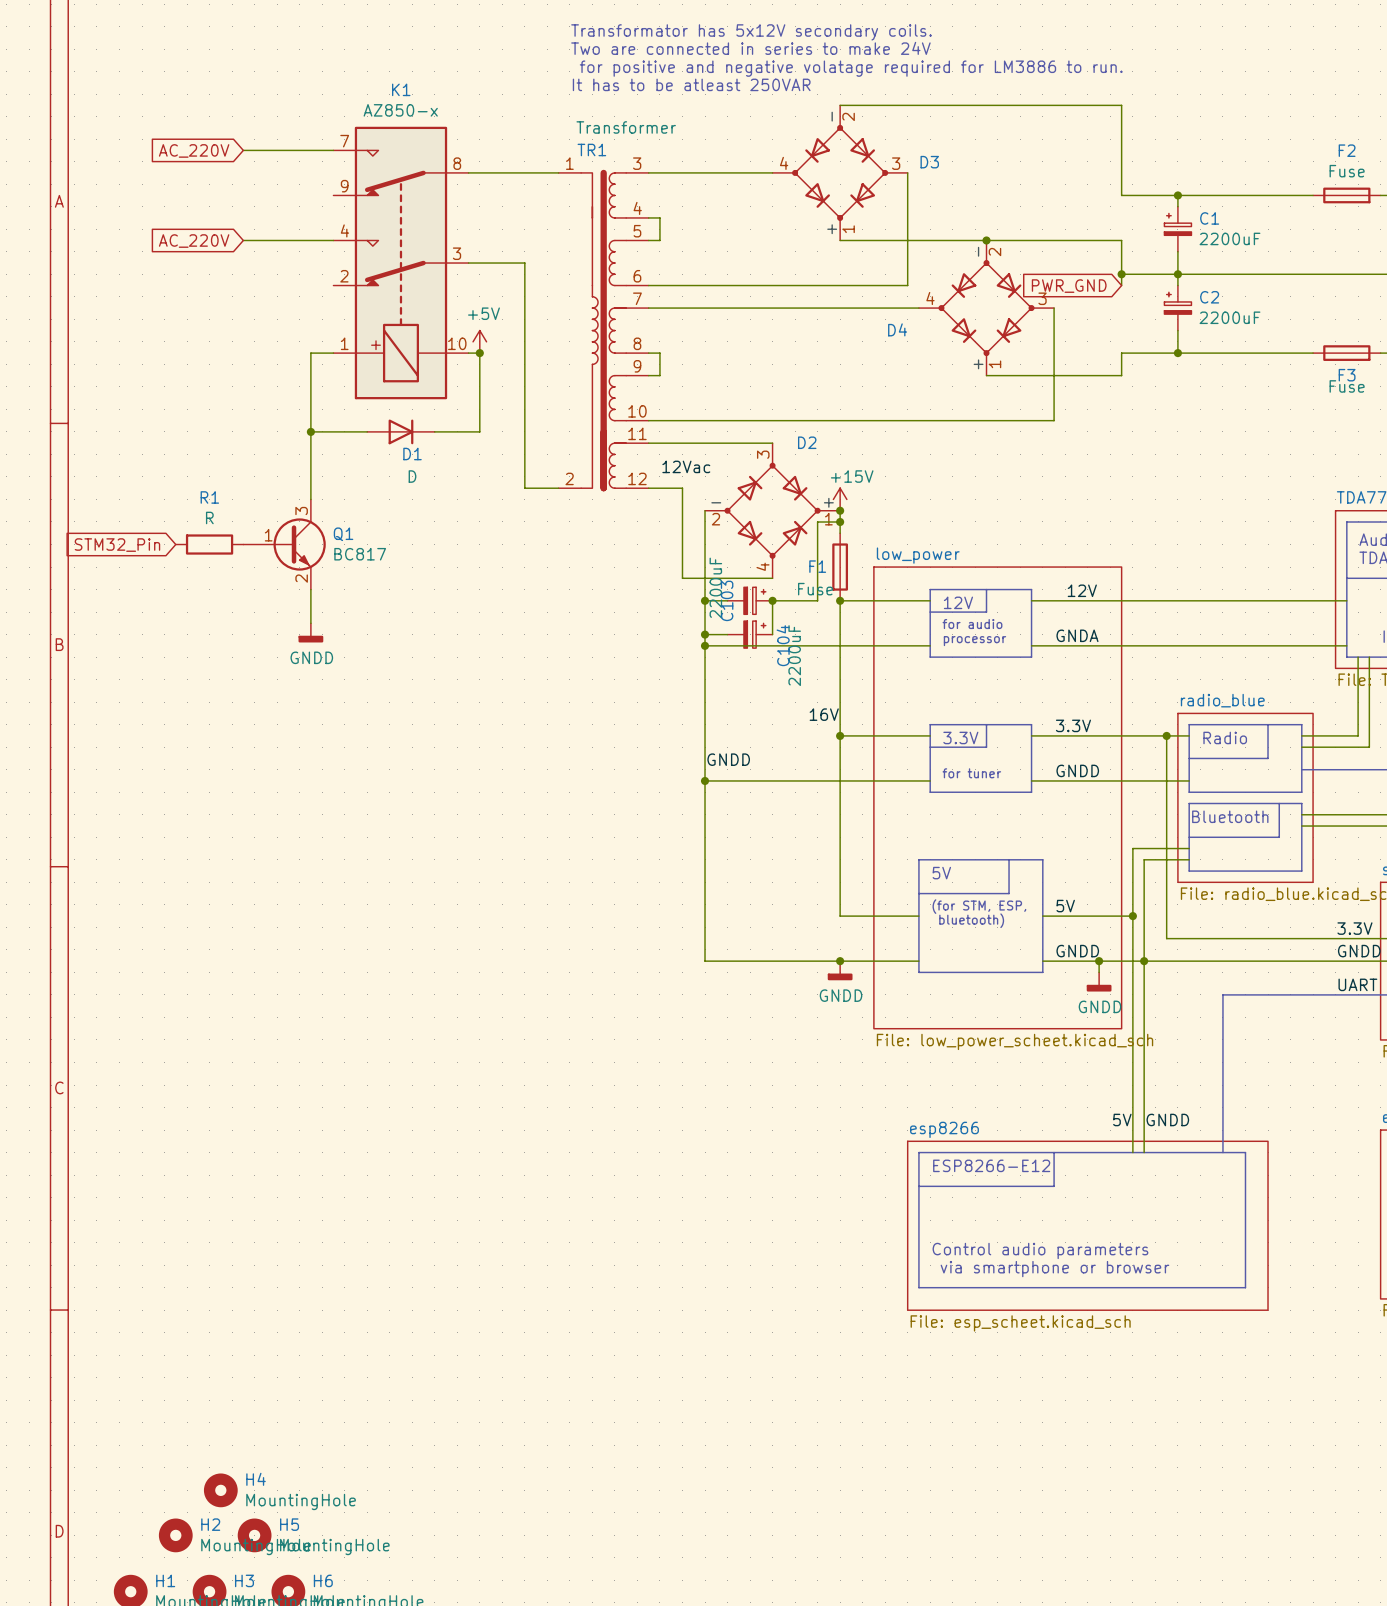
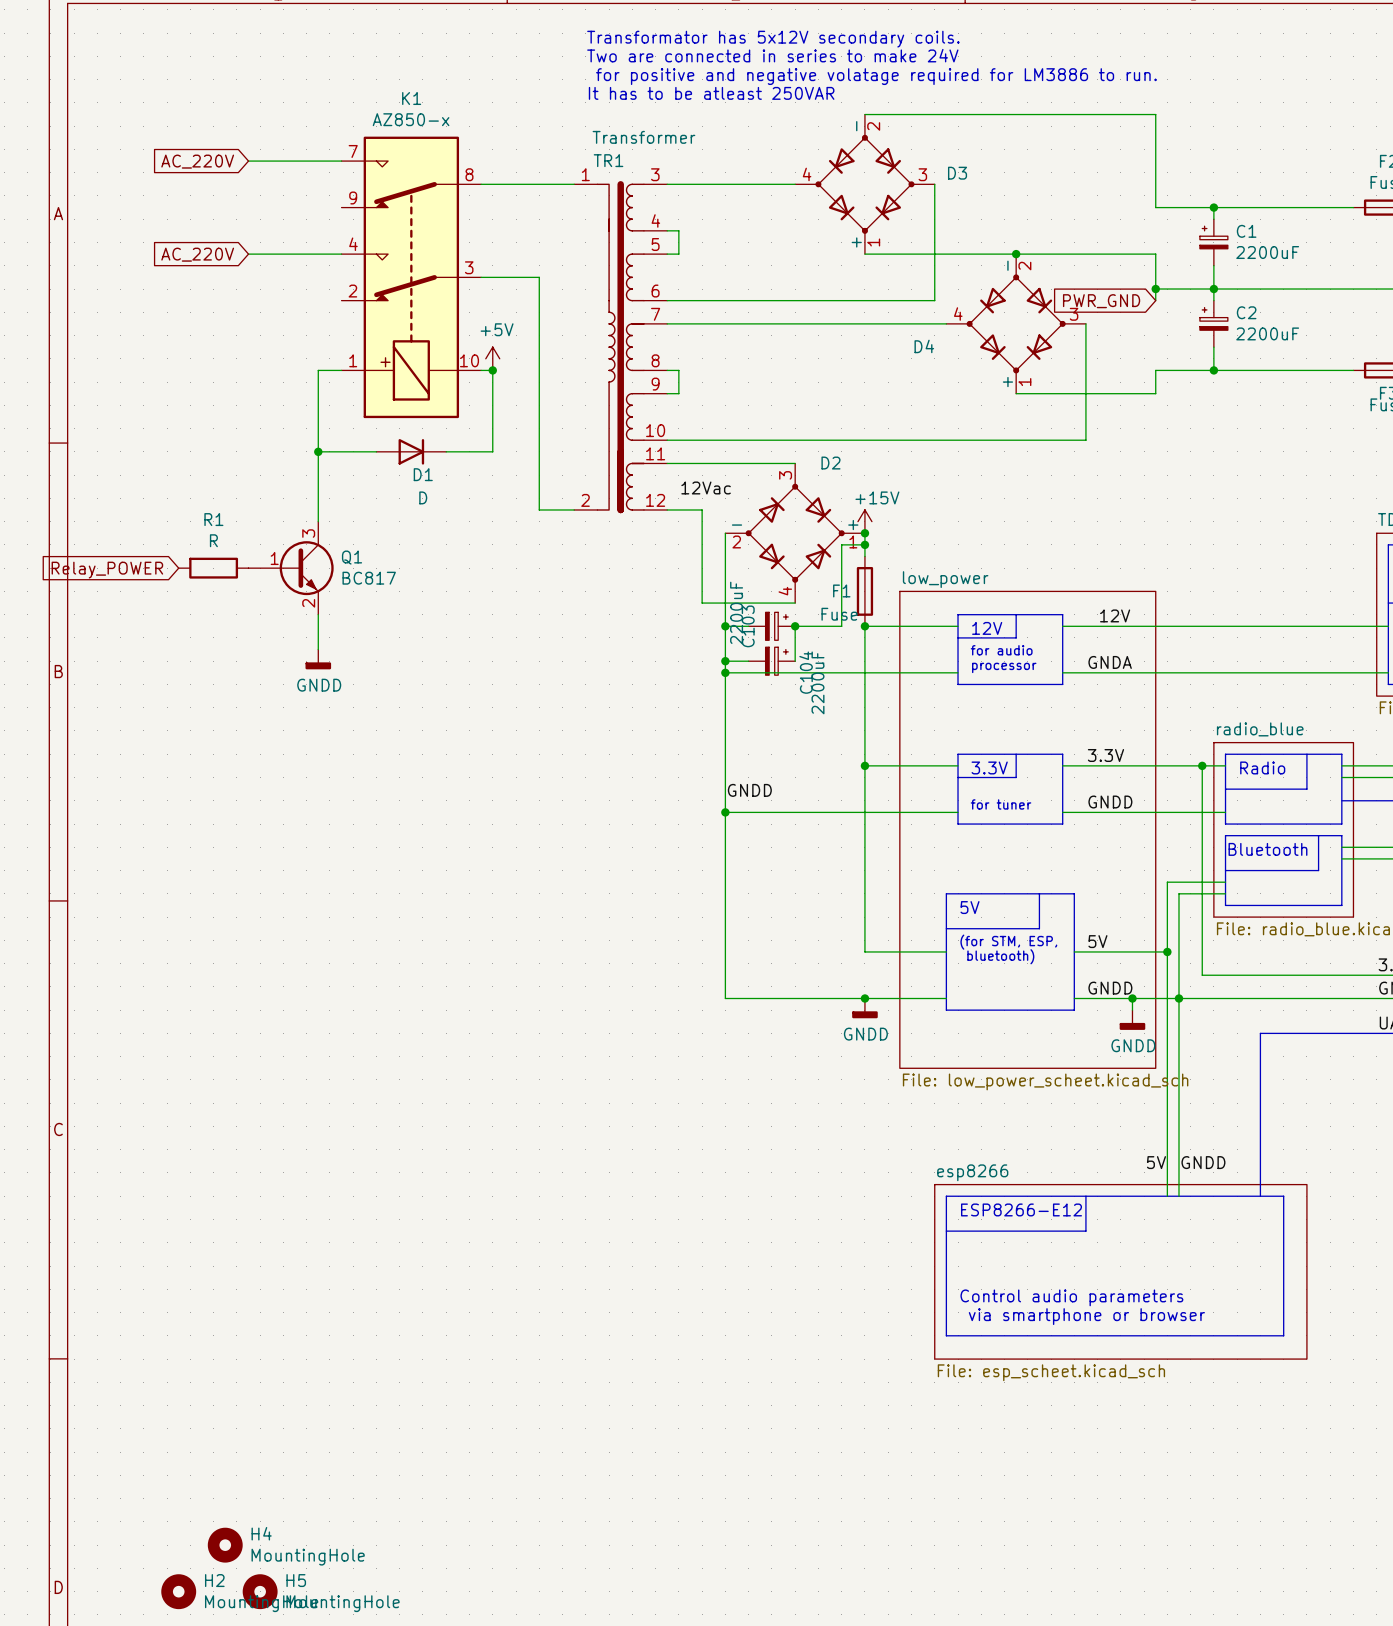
global label: STM32_Pin (117, 545) -> Relay_POWER (107, 570)
label: 16V (824, 714) -> none

